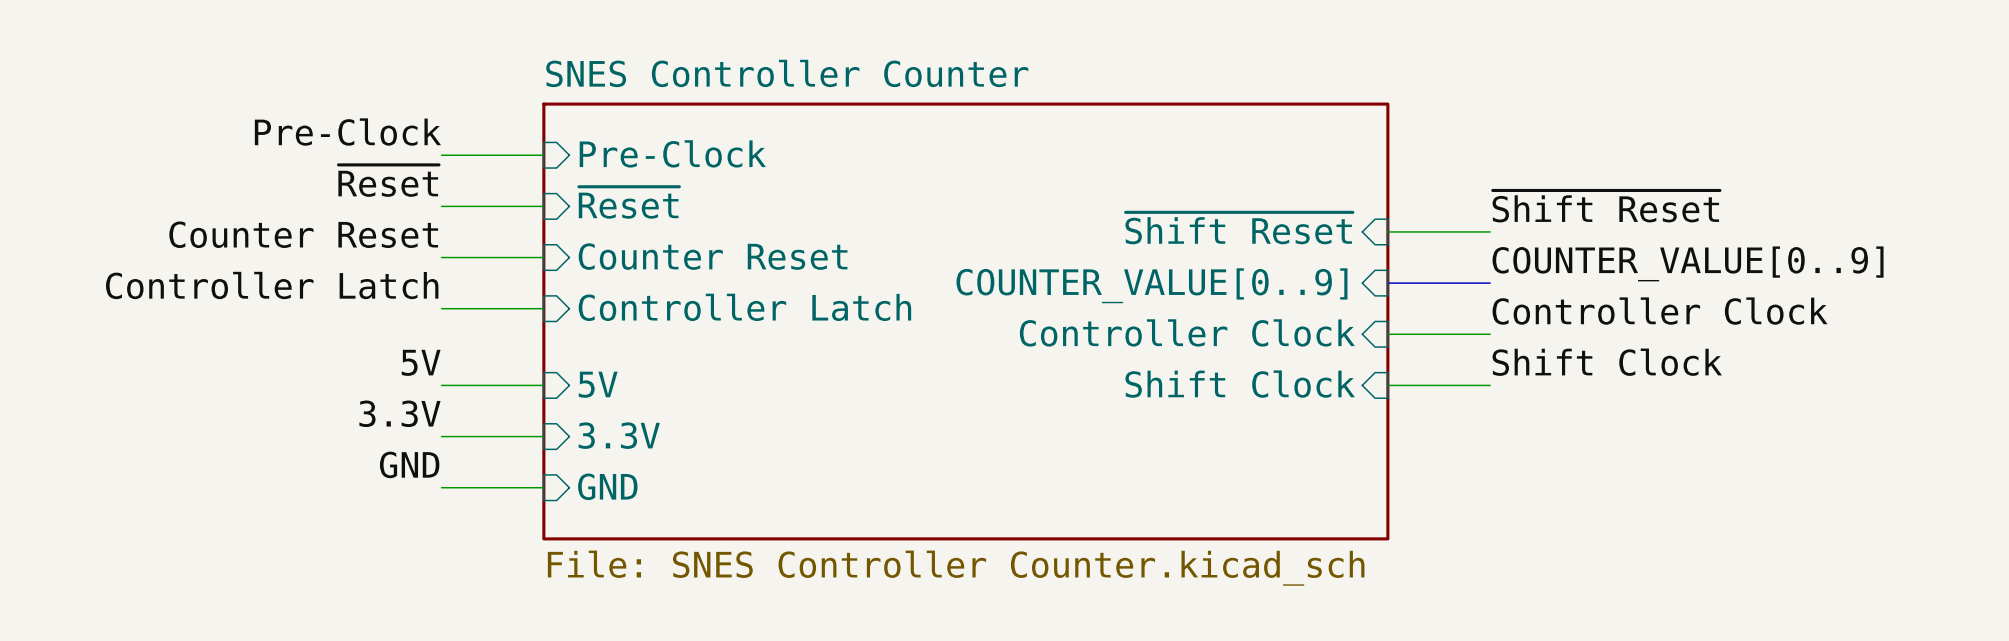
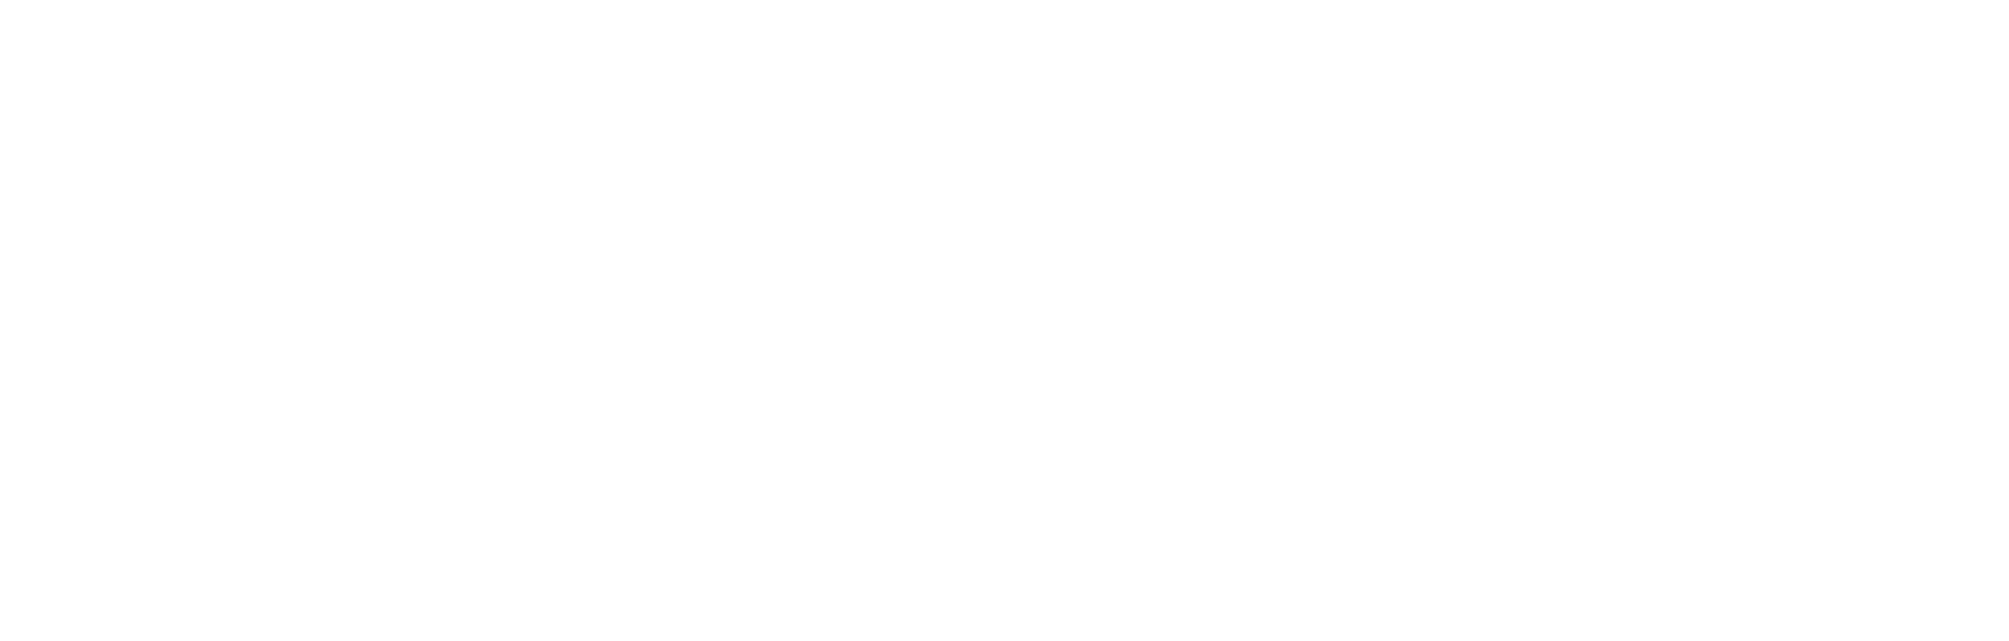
label: Pre-Clock (347, 132) -> none
sheet pin: Pre-Clock (672, 153) -> none
wire: (441, 155) (543, 155) -> none
label: ~{Reset} (388, 180) -> none
sheet pin: ~{Reset} (629, 202) -> none
wire: (441, 206) (543, 206) -> none
label: ~{Shift Reset} (1606, 206) -> none
sheet pin: ~{Shift Reset} (1239, 228) -> none
wire: (1387, 231) (1490, 231) -> none
label: Counter Reset (303, 234) -> none
sheet pin: Counter Reset (713, 256) -> none
wire: (441, 257) (543, 257) -> none
label: COUNTER_VALUE[0..9] (1688, 263) -> none
bus: (1387, 283) (1490, 283) -> none
label: Controller Latch (272, 285) -> none
sheet pin: COUNTER_VALUE[0..9] (1151, 285) -> none
sheet pin: Controller Latch (744, 307) -> none
wire: (441, 308) (543, 308) -> none
label: Controller Clock (1660, 311) -> none
sheet SNES Controller Counter: File: SNES Controller Counter.kicad_sch (965, 321) -> none
sheet pin: Controller Clock (1187, 332) -> none
wire: (1387, 334) (1490, 334) -> none
label: 5V (421, 362) -> none
label: Shift Clock (1607, 362) -> none
sheet pin: 5V (598, 384) -> none
sheet pin: Shift Clock (1240, 384) -> none
wire: (441, 385) (543, 385) -> none
wire: (1387, 385) (1490, 385) -> none
label: 3.3V (399, 413) -> none
sheet pin: 3.3V (619, 435) -> none
wire: (441, 436) (543, 436) -> none
label: GND (409, 464) -> none
sheet pin: GND (607, 486) -> none
wire: (441, 487) (543, 487) -> none

